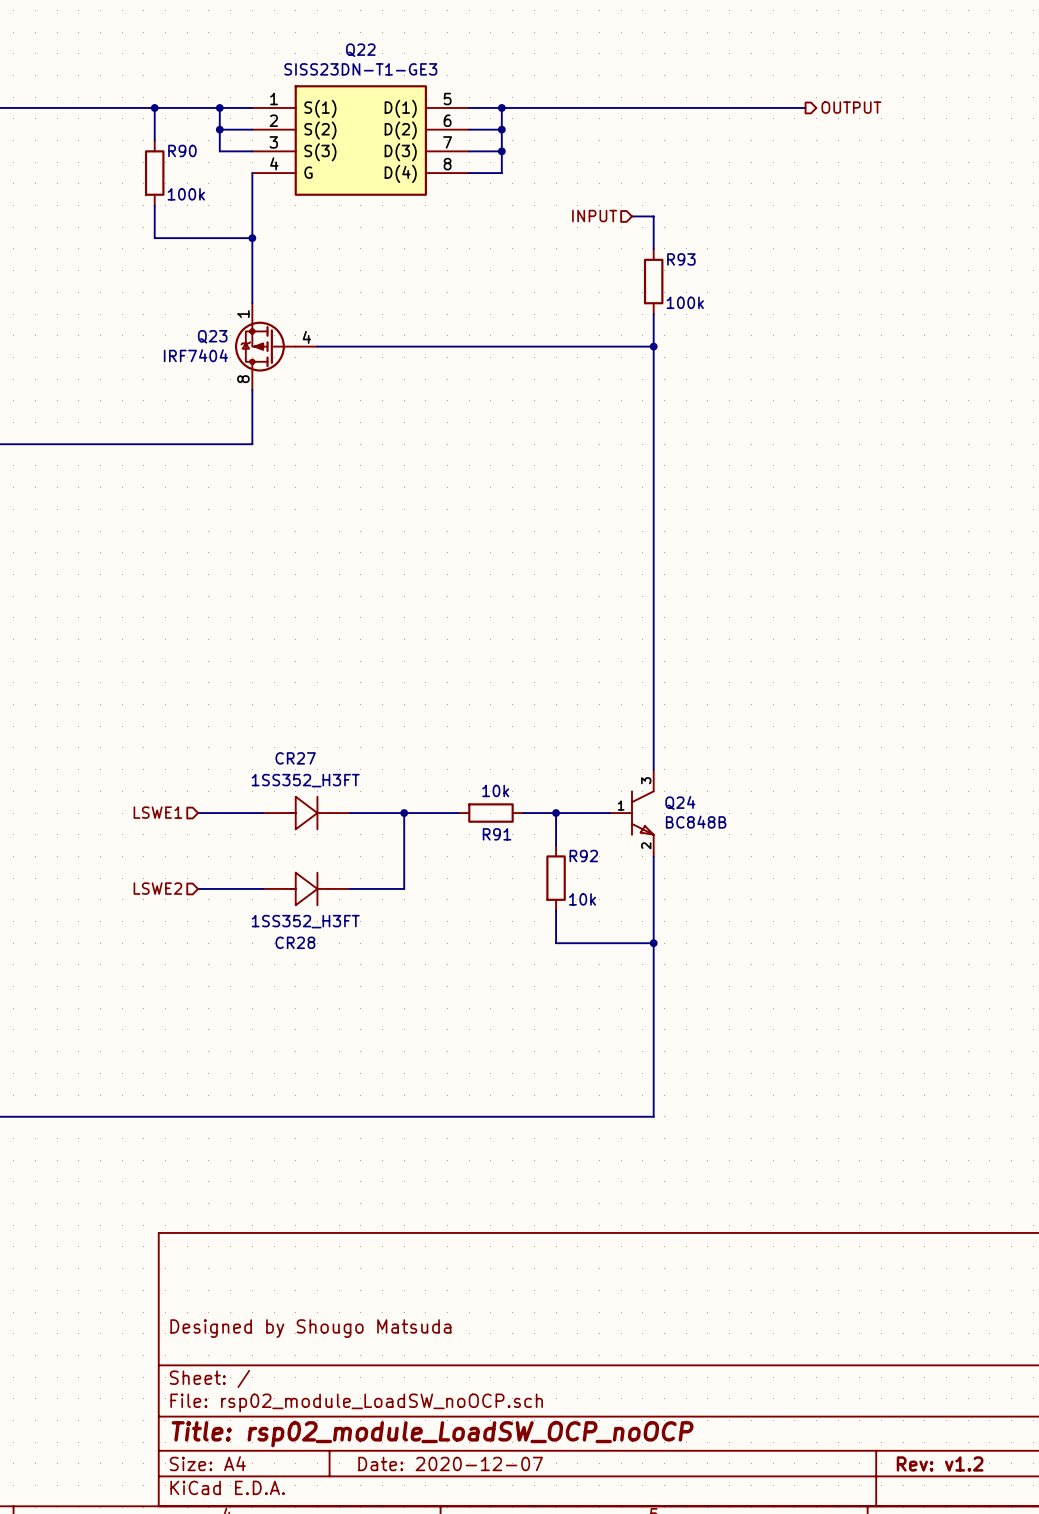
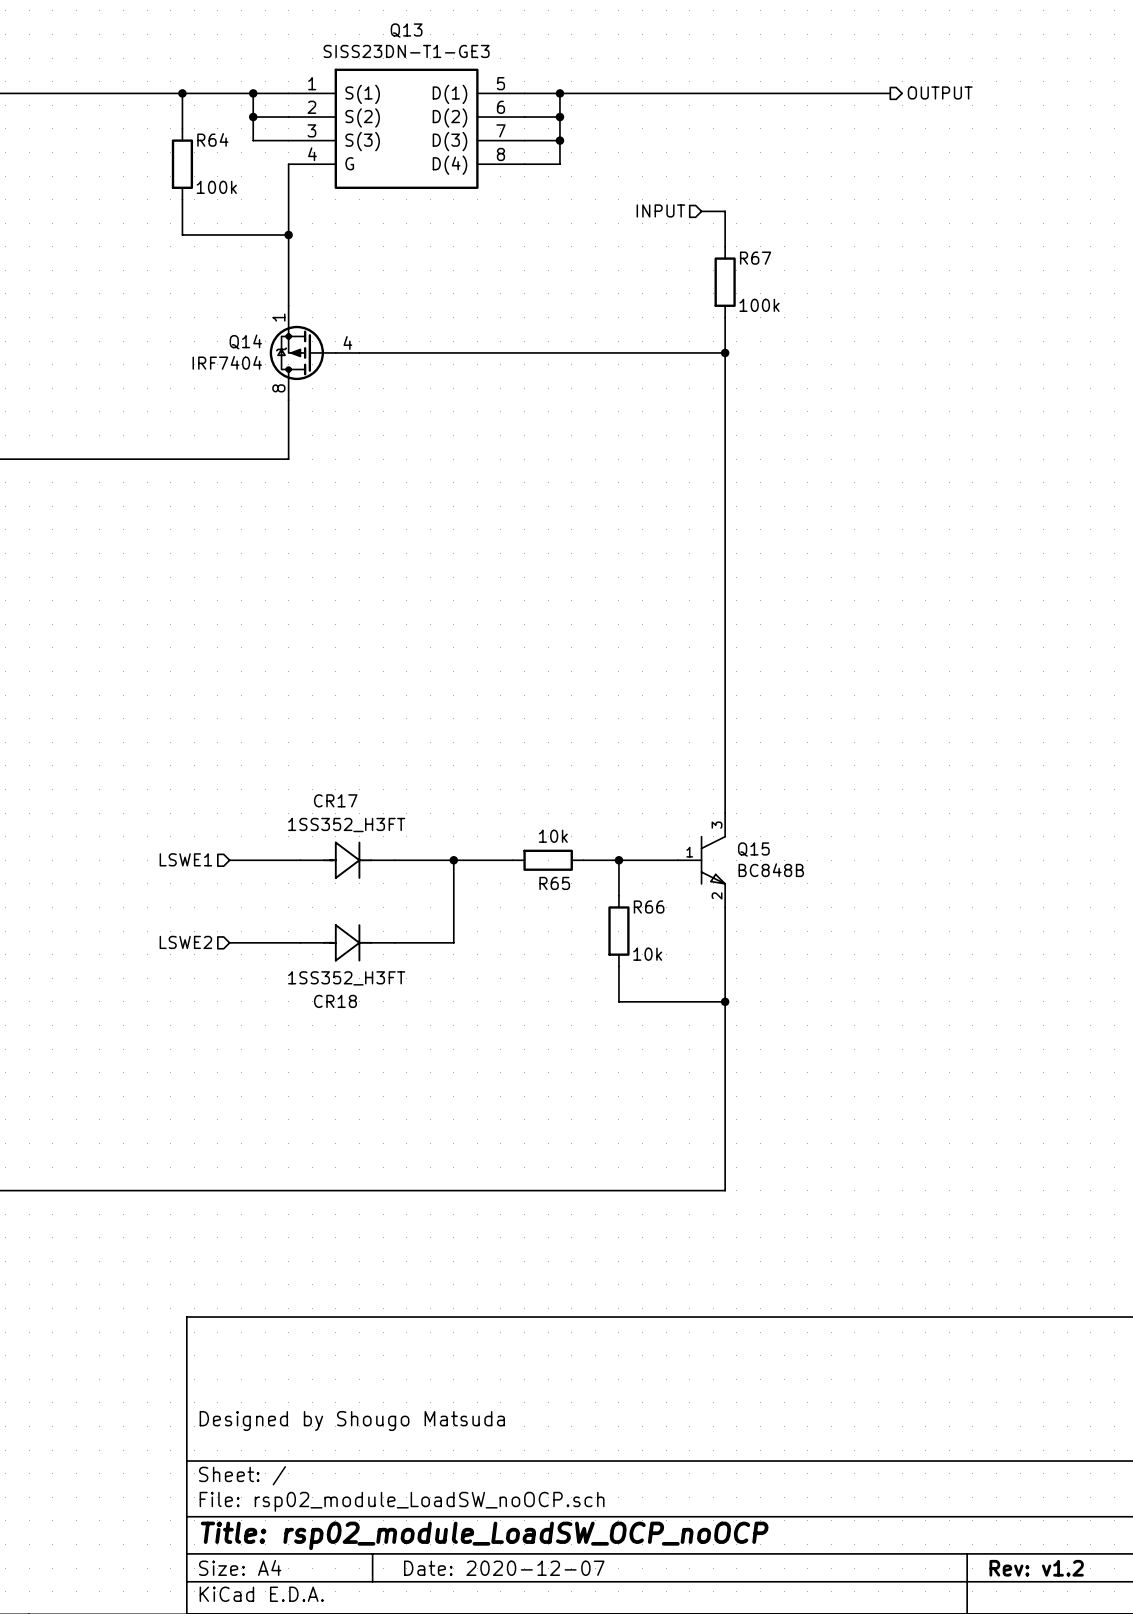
Q22 name: Q22 (360, 50) -> Q13 (406, 30)
R90 name: R90 (182, 150) -> R64 (212, 139)
R93 name: R93 (681, 259) -> R67 (755, 258)
Q23 name: Q23 (212, 336) -> Q14 (245, 341)
CR27 name: CR27 (295, 758) -> CR17 (335, 800)
Q24 name: Q24 (680, 802) -> Q15 (753, 849)
R91 name: R91 (497, 834) -> R65 (554, 883)
R92 name: R92 (583, 856) -> R66 (649, 907)
CR28 name: CR28 (295, 942) -> CR18 (335, 1001)

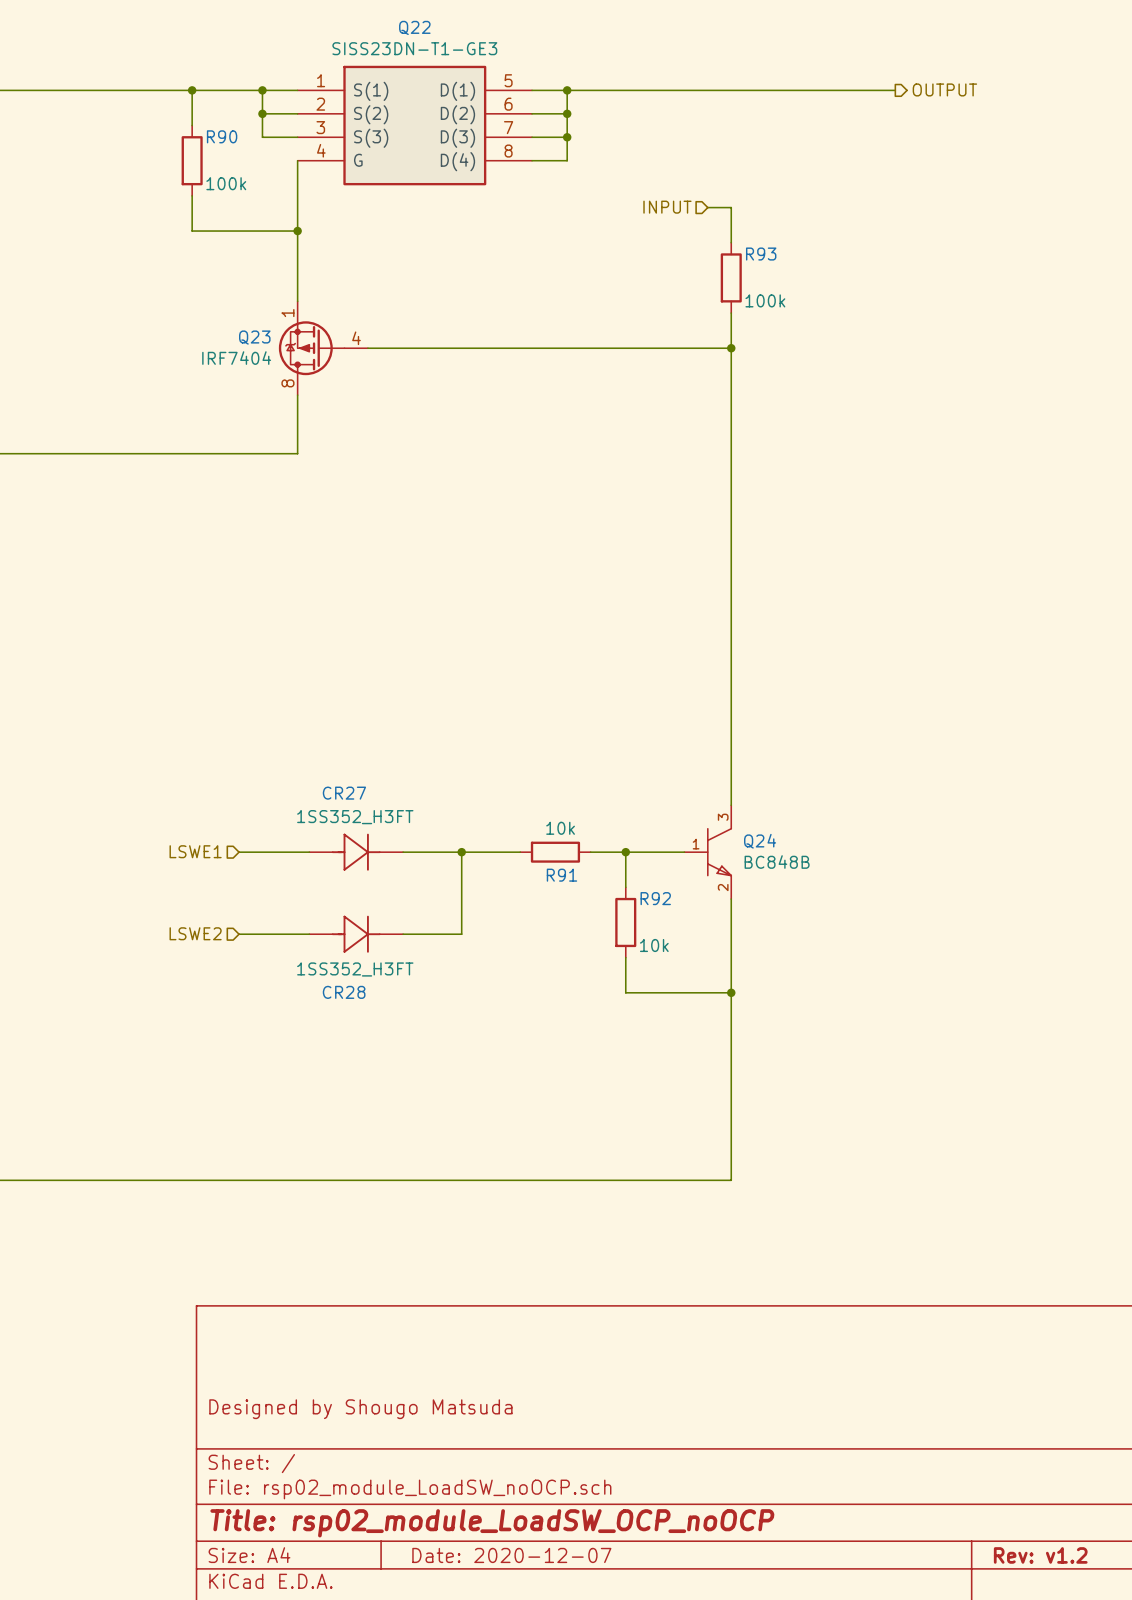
Q13 name: Q13 (406, 30) -> Q22 (414, 27)
R64 name: R64 (212, 139) -> R90 (222, 136)
R67 name: R67 (755, 258) -> R93 (761, 254)
Q14 name: Q14 (245, 341) -> Q23 (254, 337)
CR17 name: CR17 (335, 800) -> CR27 (344, 793)
Q15 name: Q15 (753, 849) -> Q24 (760, 841)
R65 name: R65 (554, 883) -> R91 (561, 875)
R66 name: R66 (649, 907) -> R92 (655, 898)
CR18 name: CR18 (335, 1001) -> CR28 (344, 992)

